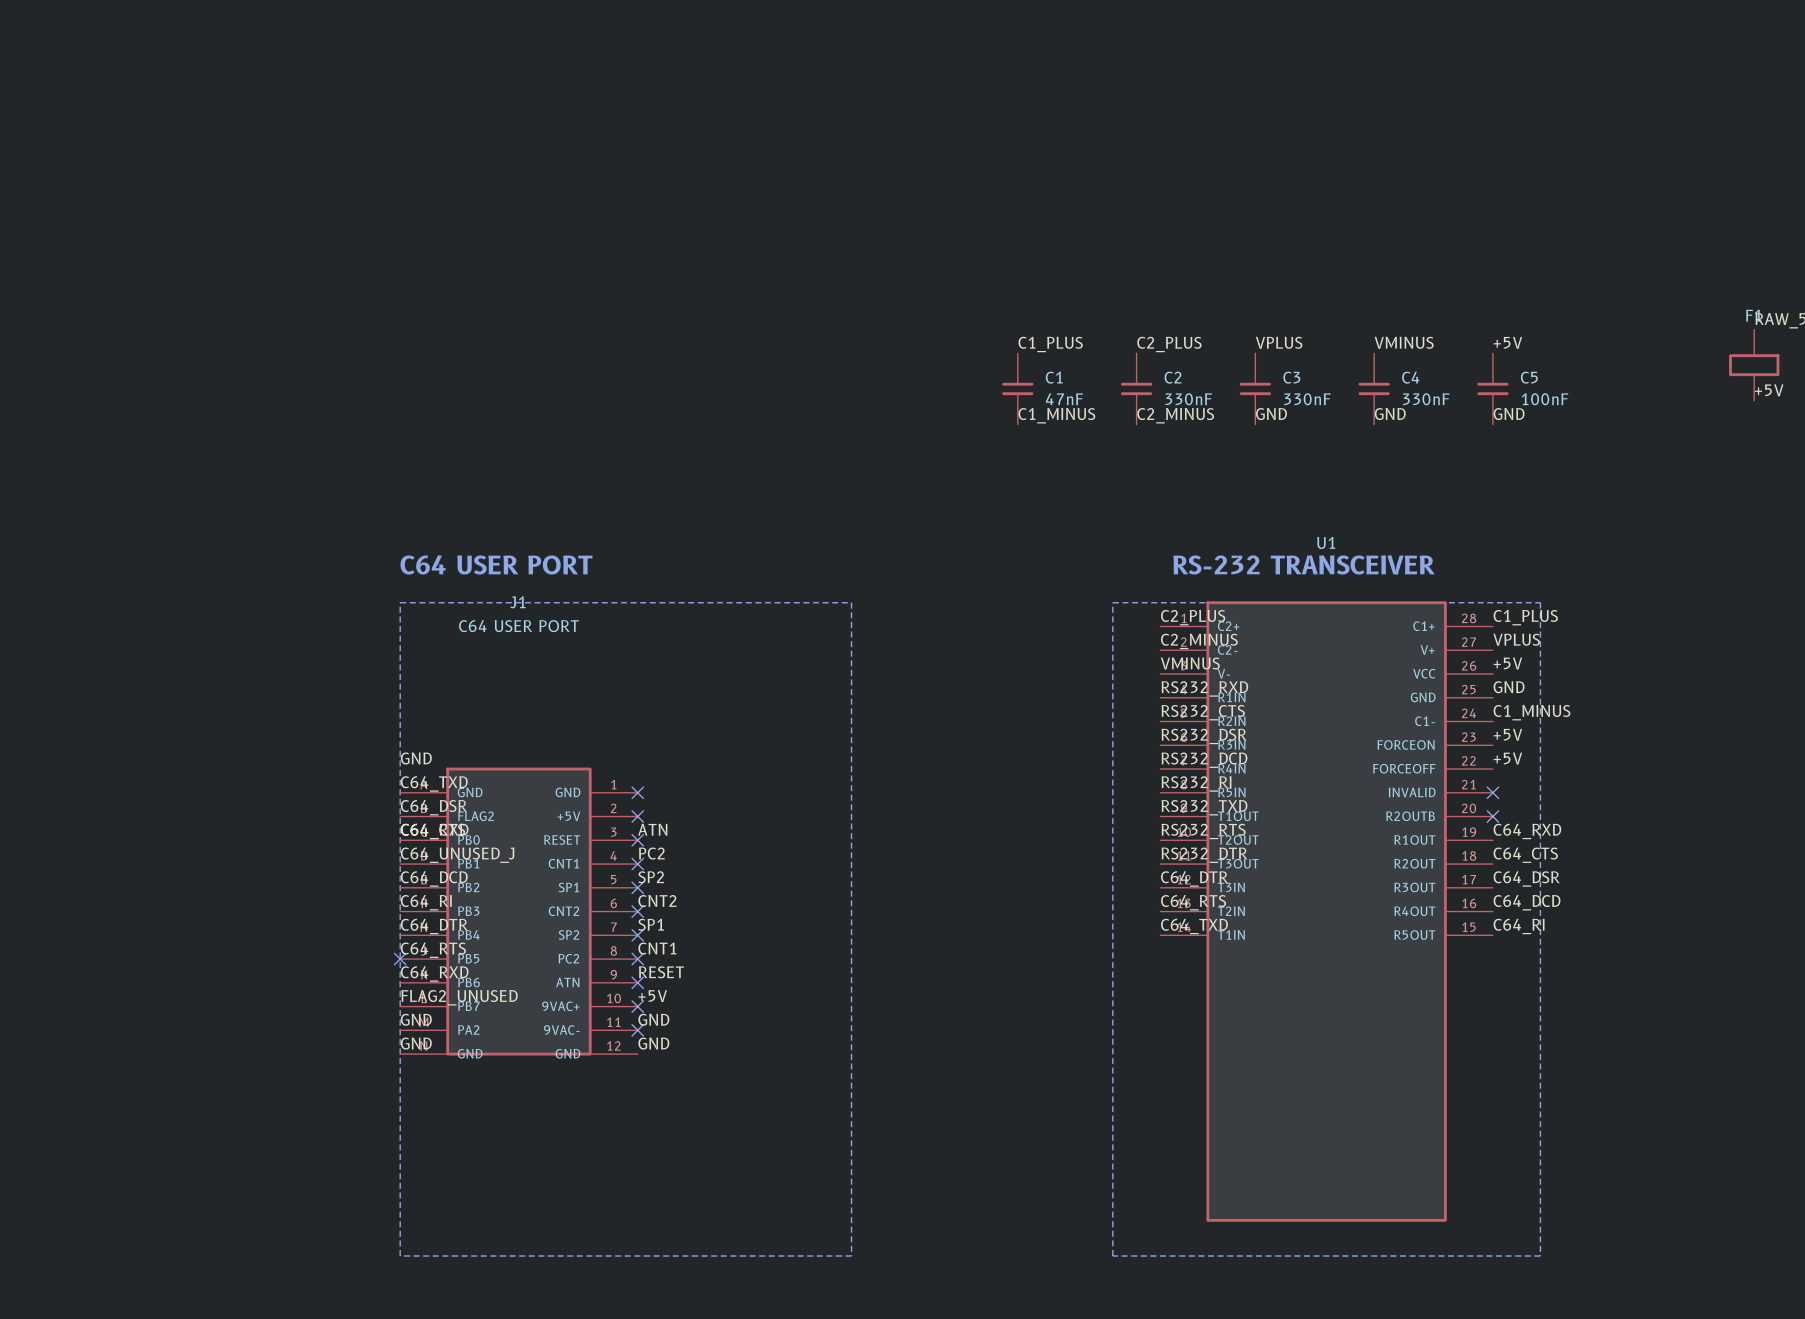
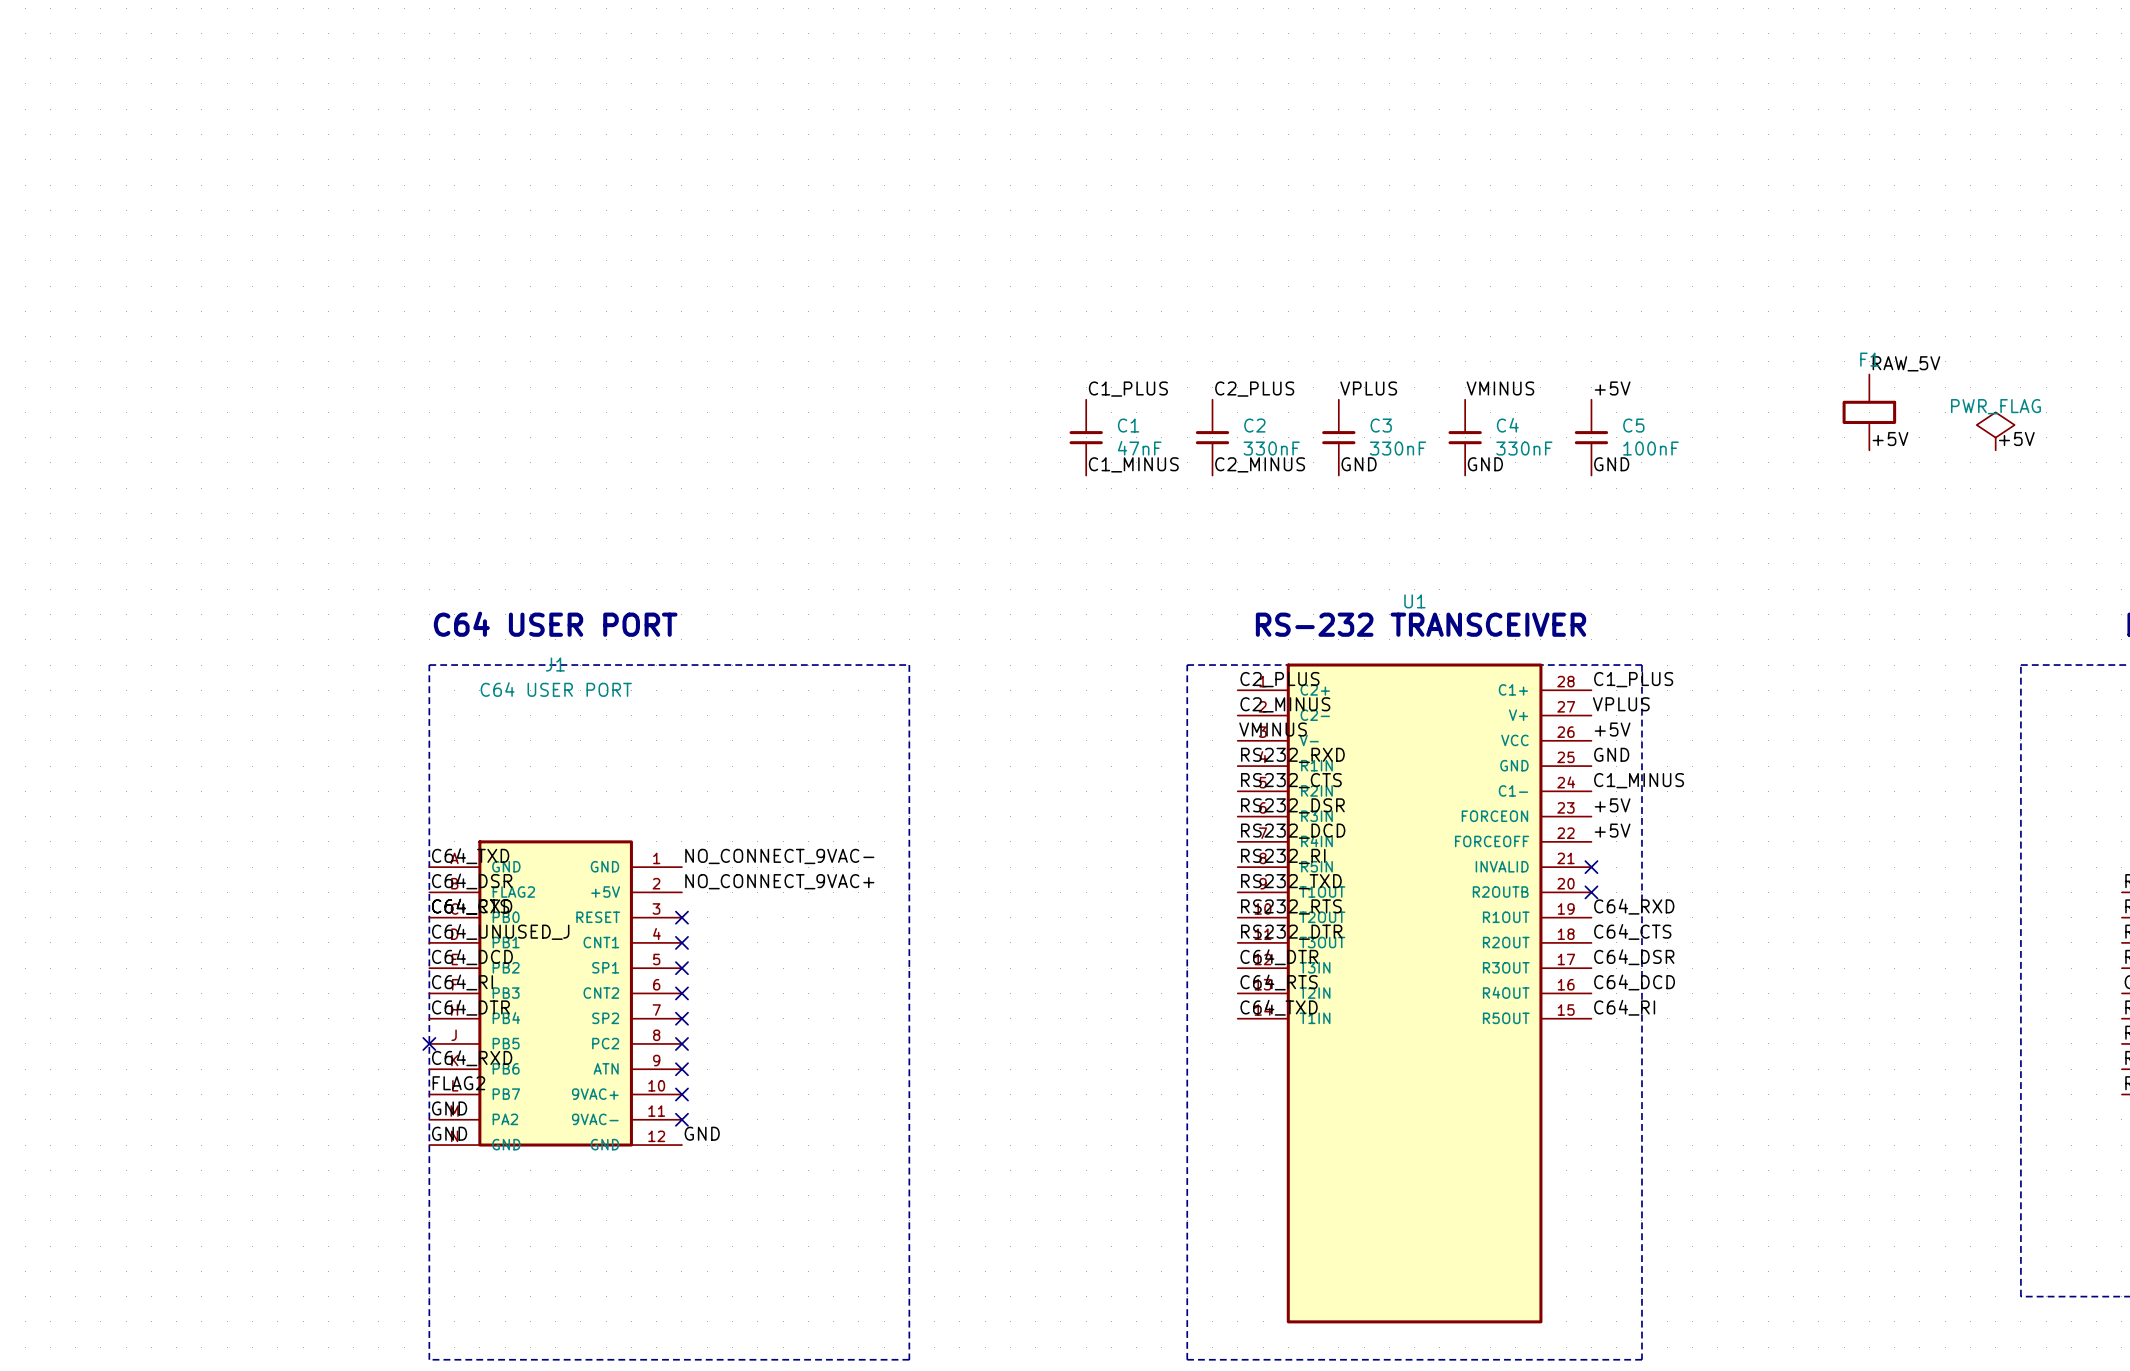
label: GND (416, 758) -> none
label: none -> NO_CONNECT_9VAC- (779, 856)
no-connect mark: (637, 792) -> none
label: none -> NO_CONNECT_9VAC+ (779, 881)
no-connect mark: (637, 816) -> none
label: ATN (652, 829) -> none
label: PC2 (651, 853) -> none
label: SP2 (651, 877) -> none
label: CNT2 (657, 901) -> none
label: SP1 (651, 924) -> none
label: CNT1 (657, 948) -> none
label: C64_RTS (433, 950) -> none
label: RESET (661, 972) -> none
label: +5V (652, 996) -> none
label: FLAG2_UNUSED (459, 997) -> FLAG2 (458, 1083)
label: GND (653, 1019) -> none

